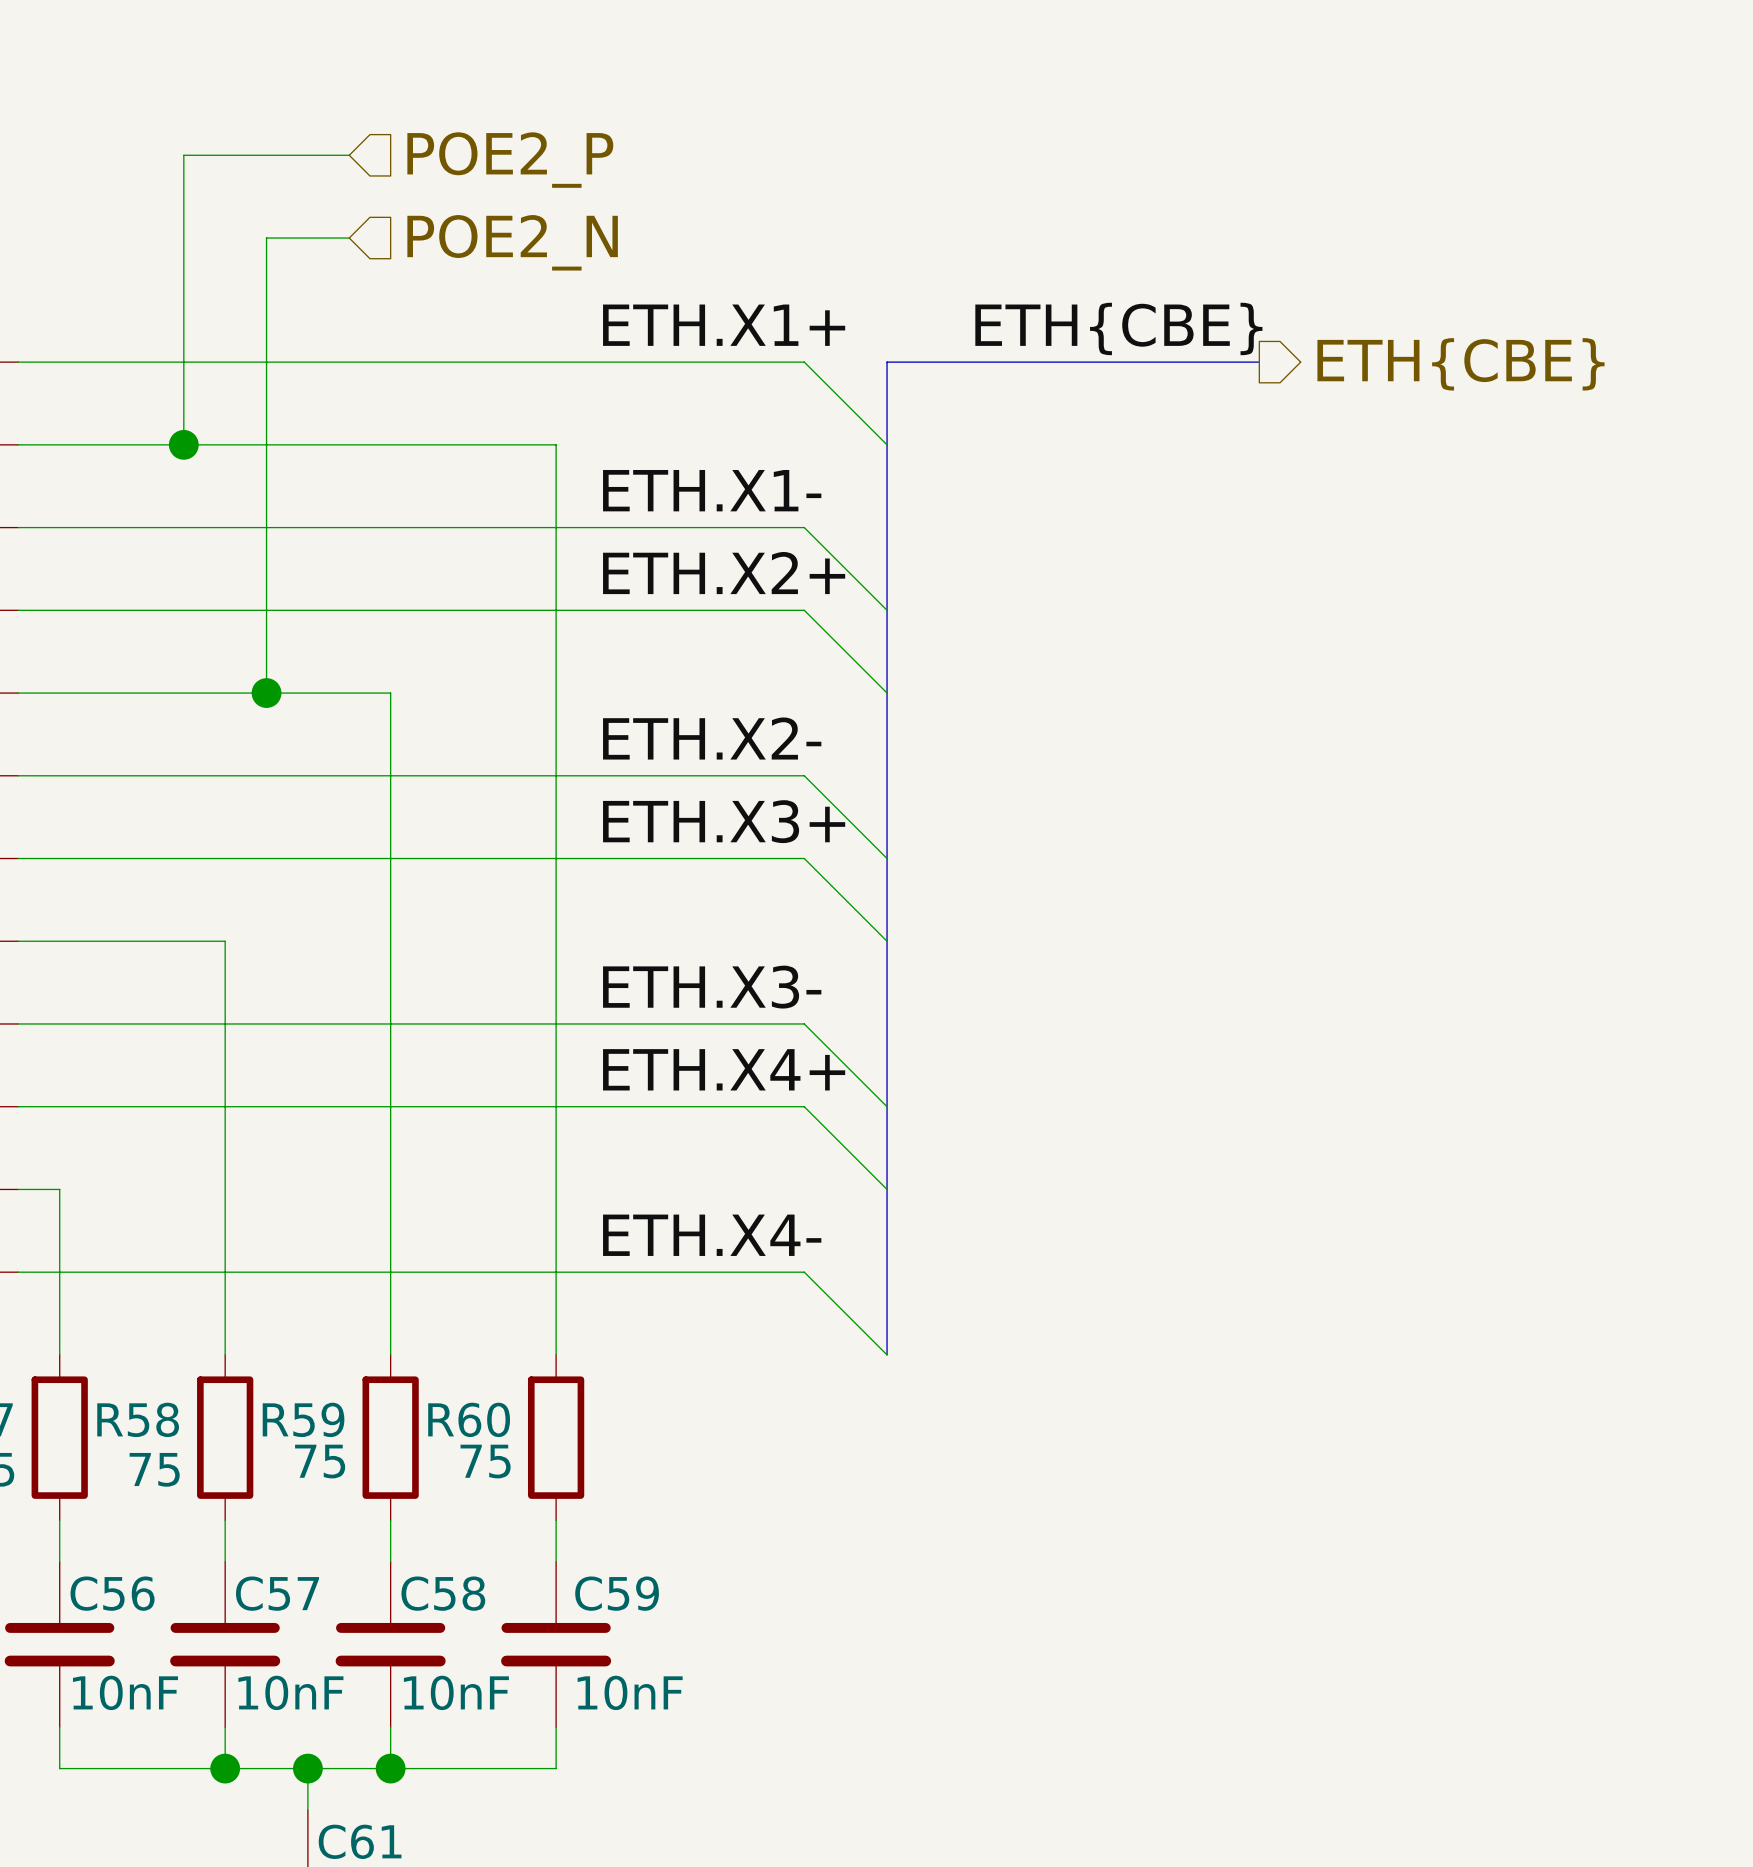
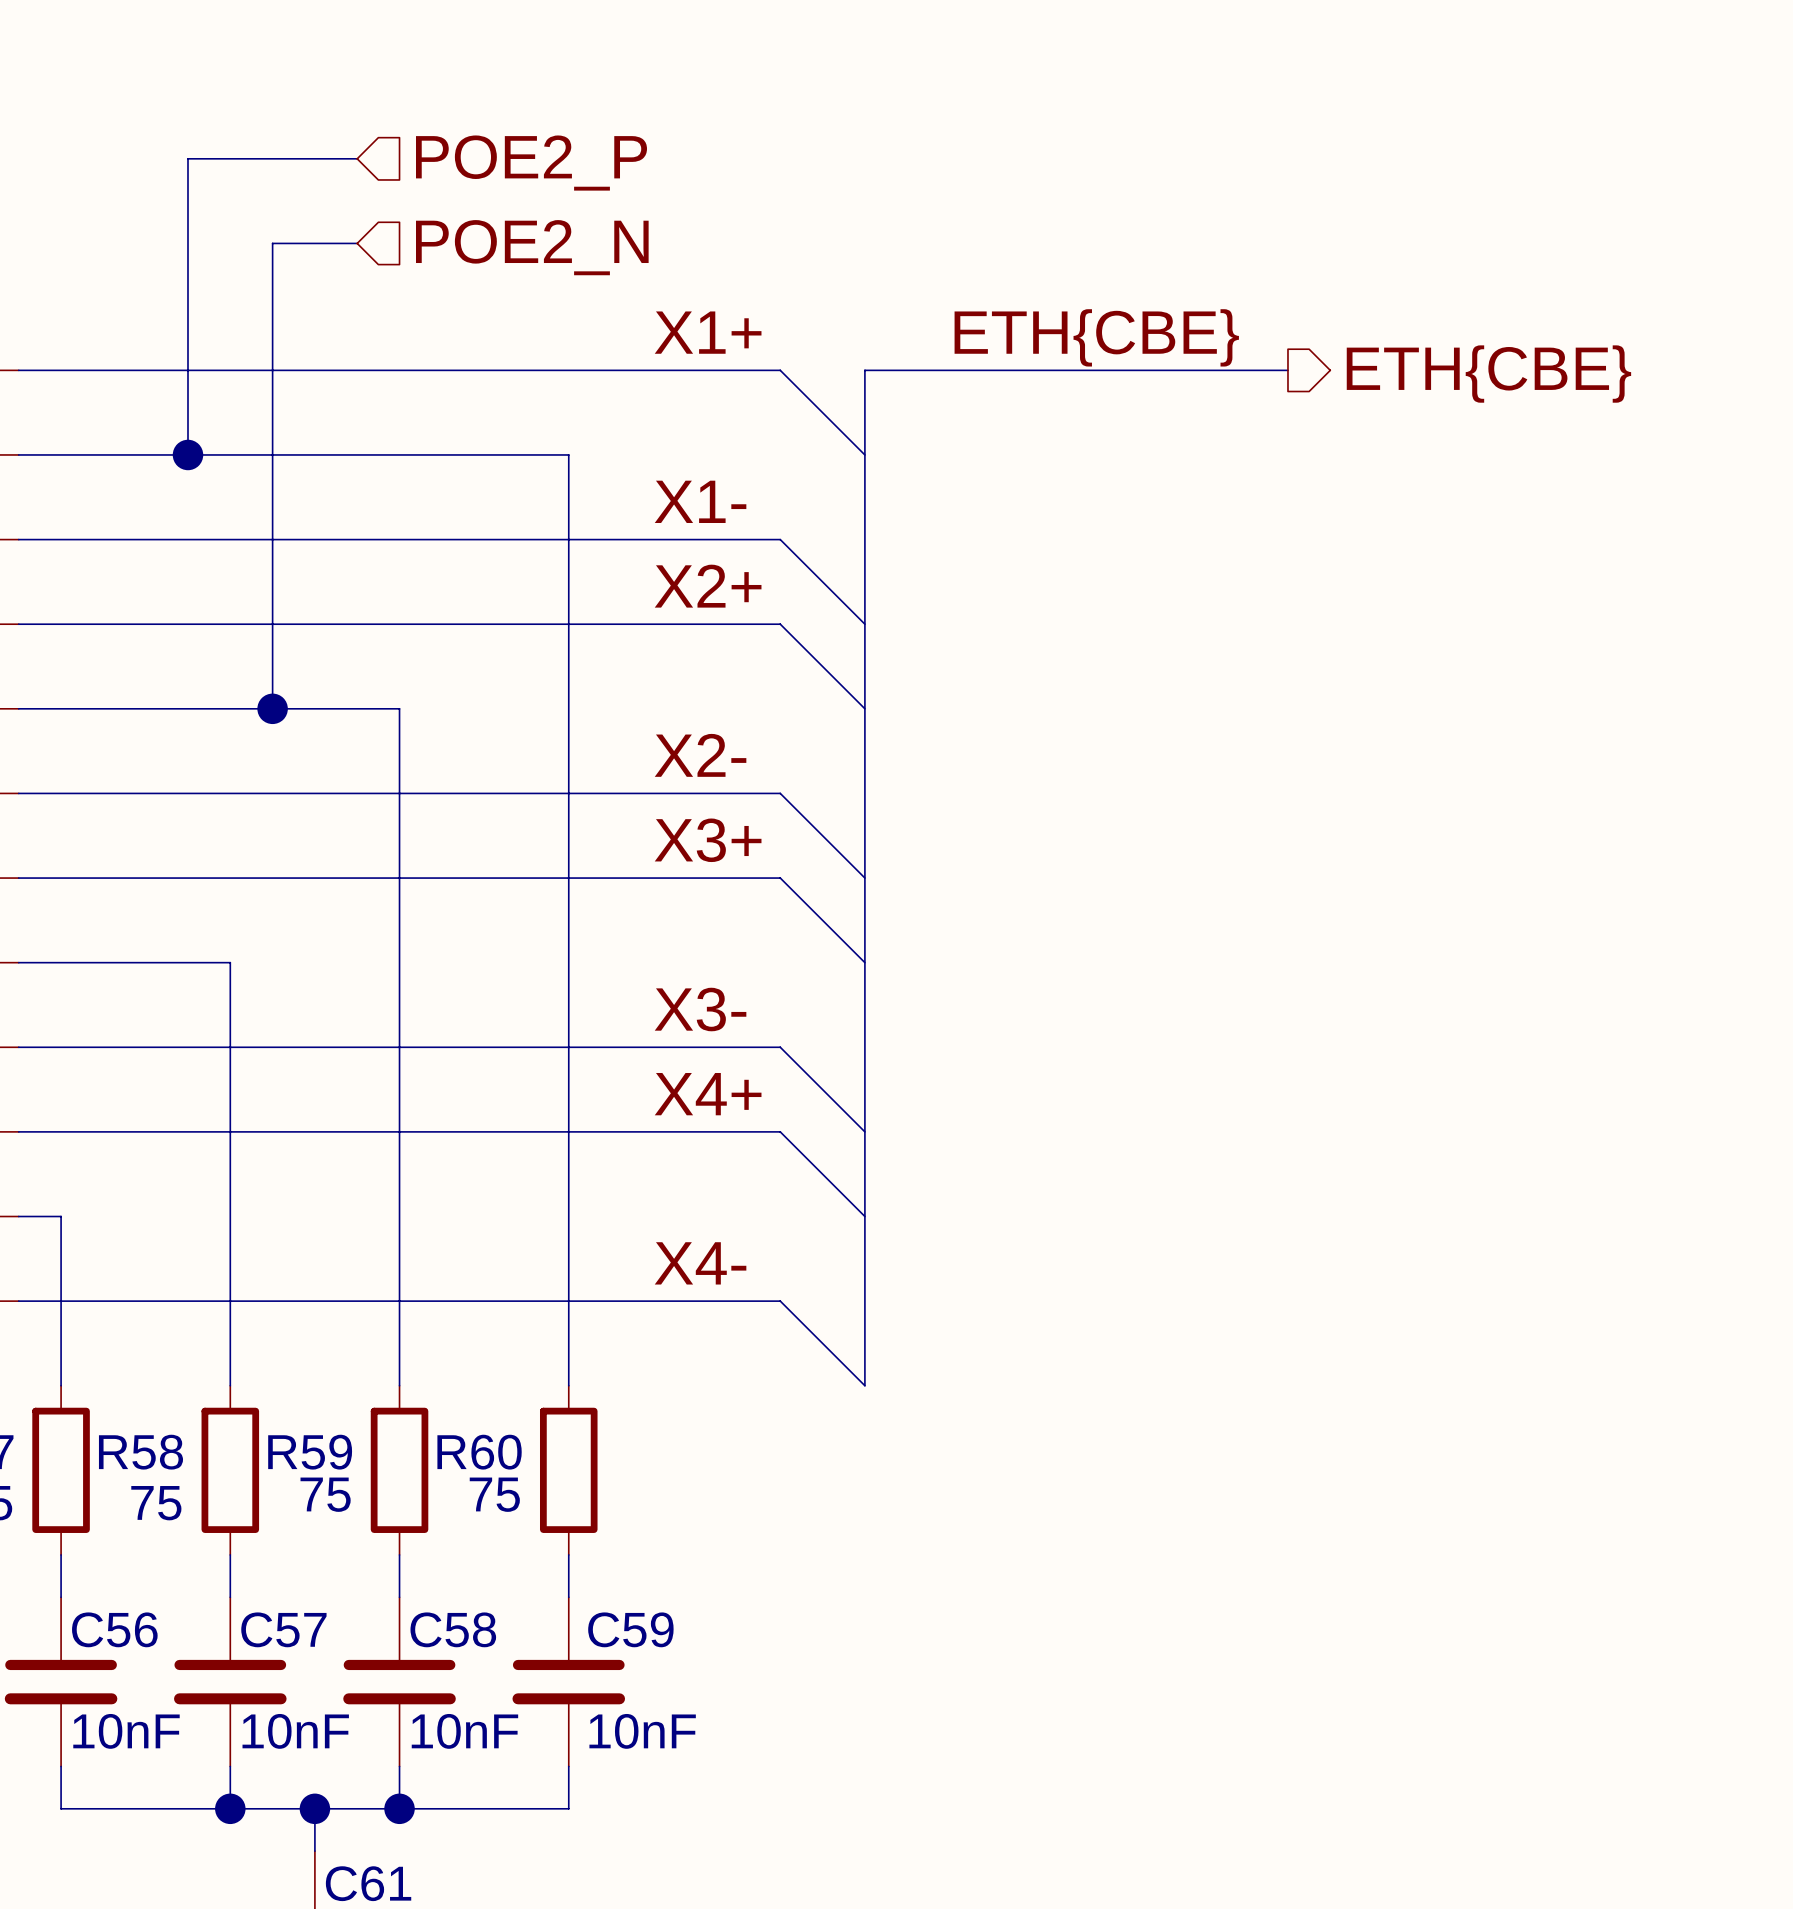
label: none -> X1+ (708, 332)
label: ETH.X1+ (724, 325) -> none
label position: ETH{CBE} (1118, 328) -> ETH{CBE} (1096, 337)
wire: (762, 362) (804, 362) (887, 444) -> (780, 370) (864, 454)
bus: (887, 362) (887, 1354) -> (907, 370) (864, 370) (864, 1385)
label: none -> X1- (700, 501)
label: ETH.X1- (712, 490) -> none
wire: (762, 527) (804, 527) (887, 610) -> (780, 539) (864, 624)
label: none -> X2+ (708, 586)
label: ETH.X2+ (724, 573) -> none
wire: (762, 610) (804, 610) (887, 693) -> (780, 624) (864, 708)
label: none -> X2- (700, 755)
label: ETH.X2- (712, 738) -> none
wire: (762, 775) (804, 775) (887, 858) -> (780, 793) (864, 878)
label: none -> X3+ (708, 840)
label: ETH.X3+ (724, 821) -> none
wire: (762, 858) (804, 858) (887, 941) -> (780, 878) (864, 962)
label: none -> X3- (700, 1009)
label: ETH.X3- (712, 987) -> none
wire: (762, 1023) (804, 1023) (887, 1106) -> (780, 1047) (864, 1131)
label: none -> X4+ (708, 1094)
label: ETH.X4+ (724, 1069) -> none
wire: (762, 1106) (804, 1106) (887, 1189) -> (780, 1131) (864, 1216)
label: none -> X4- (700, 1263)
label: ETH.X4- (712, 1235) -> none
wire: (762, 1272) (804, 1272) (887, 1354) -> (780, 1301) (864, 1385)

